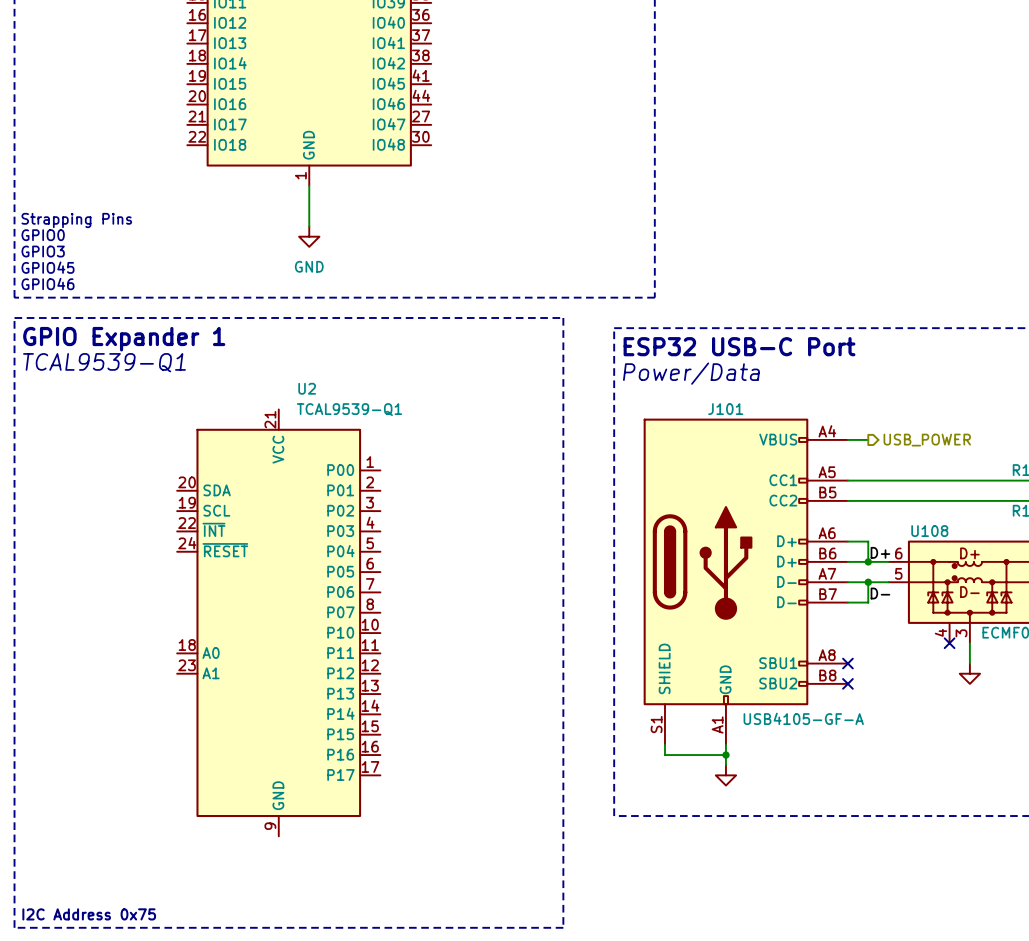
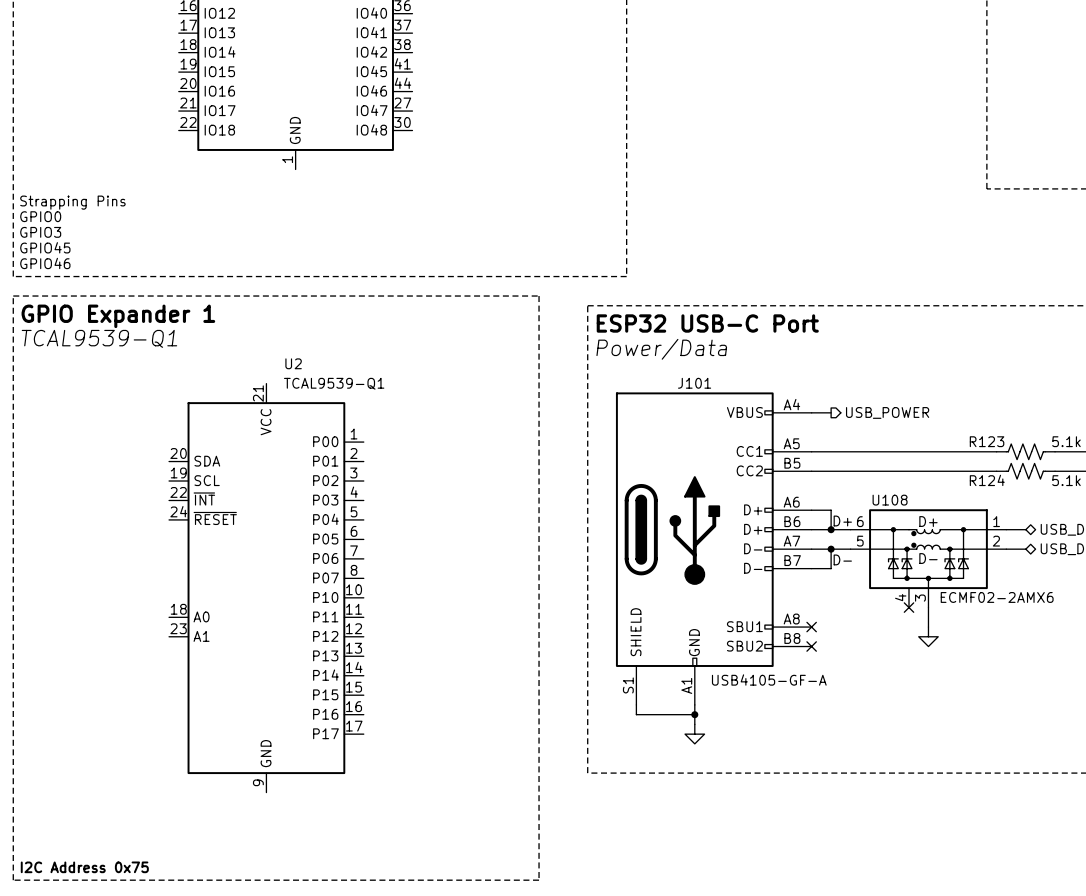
wire: (309, 185) (309, 226) -> none
power symbol: GND (309, 236) -> none

